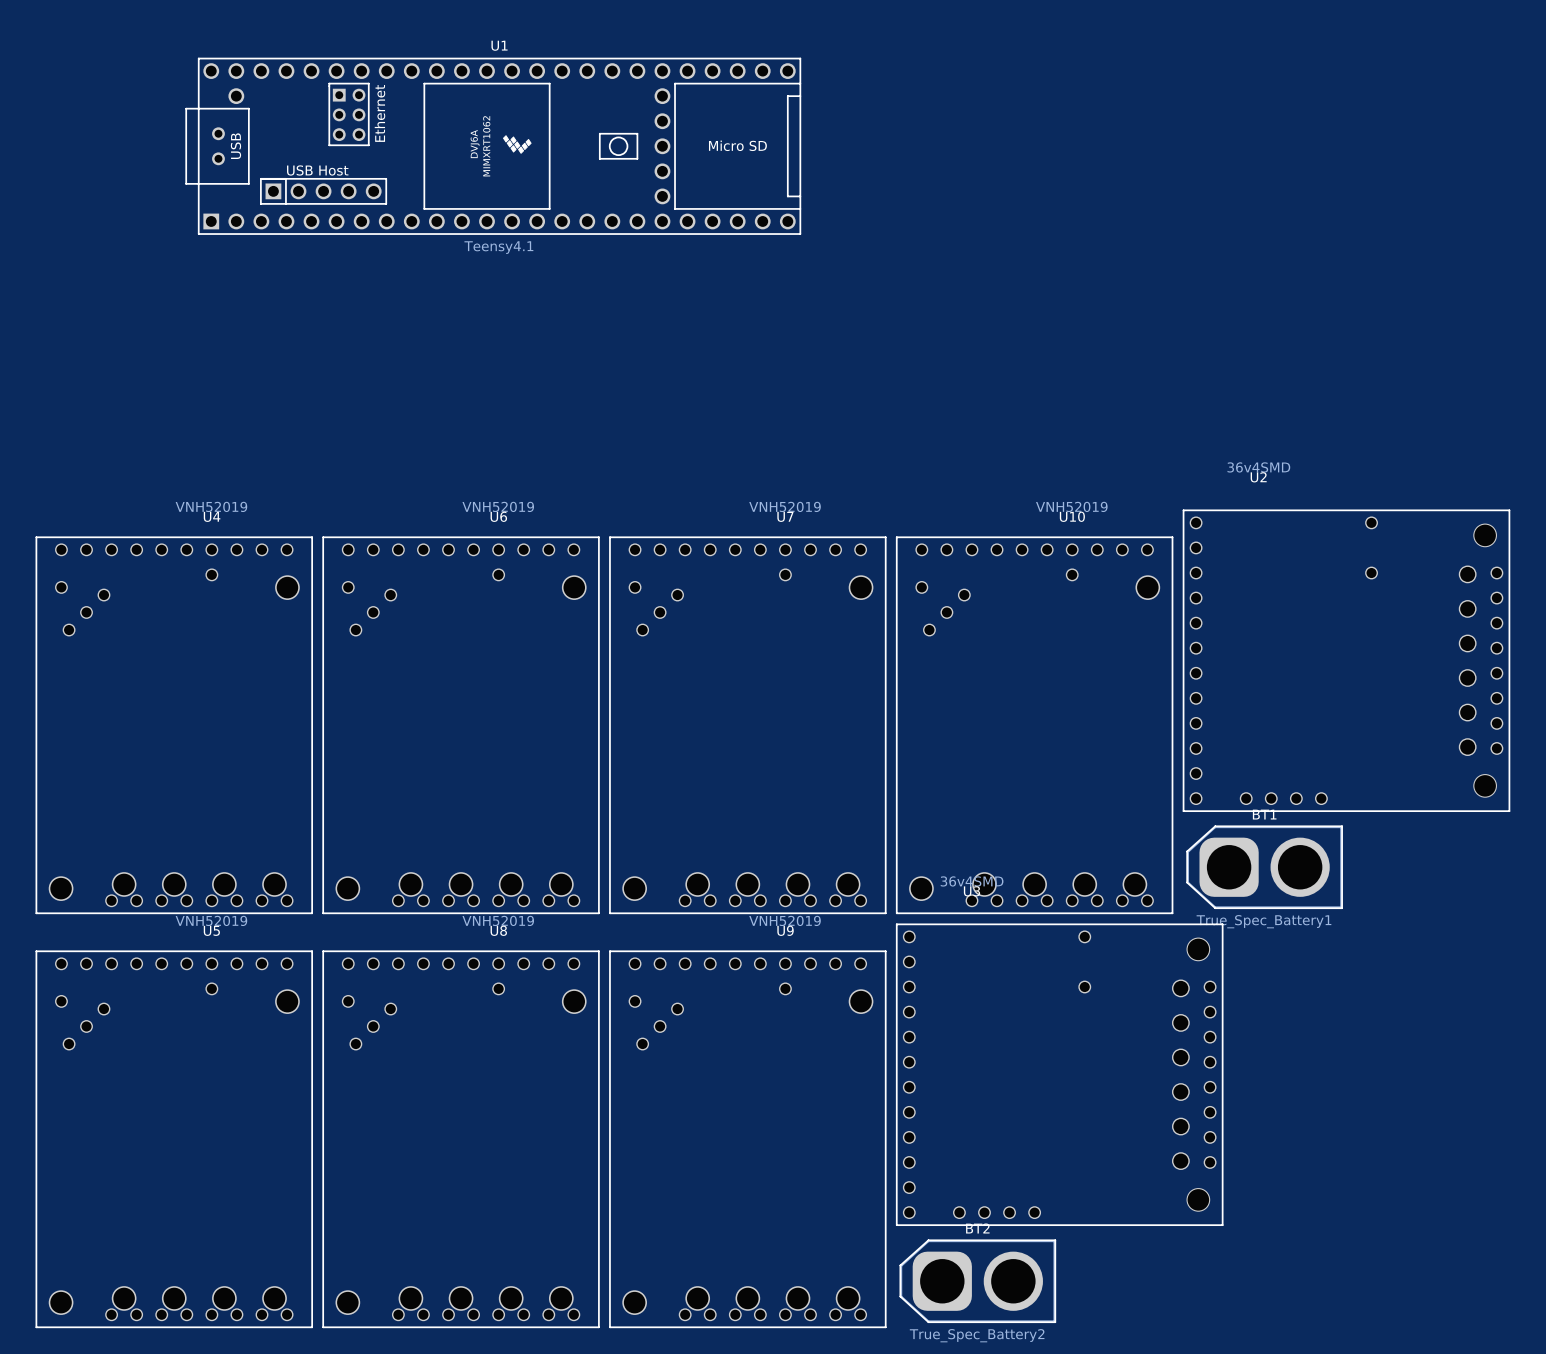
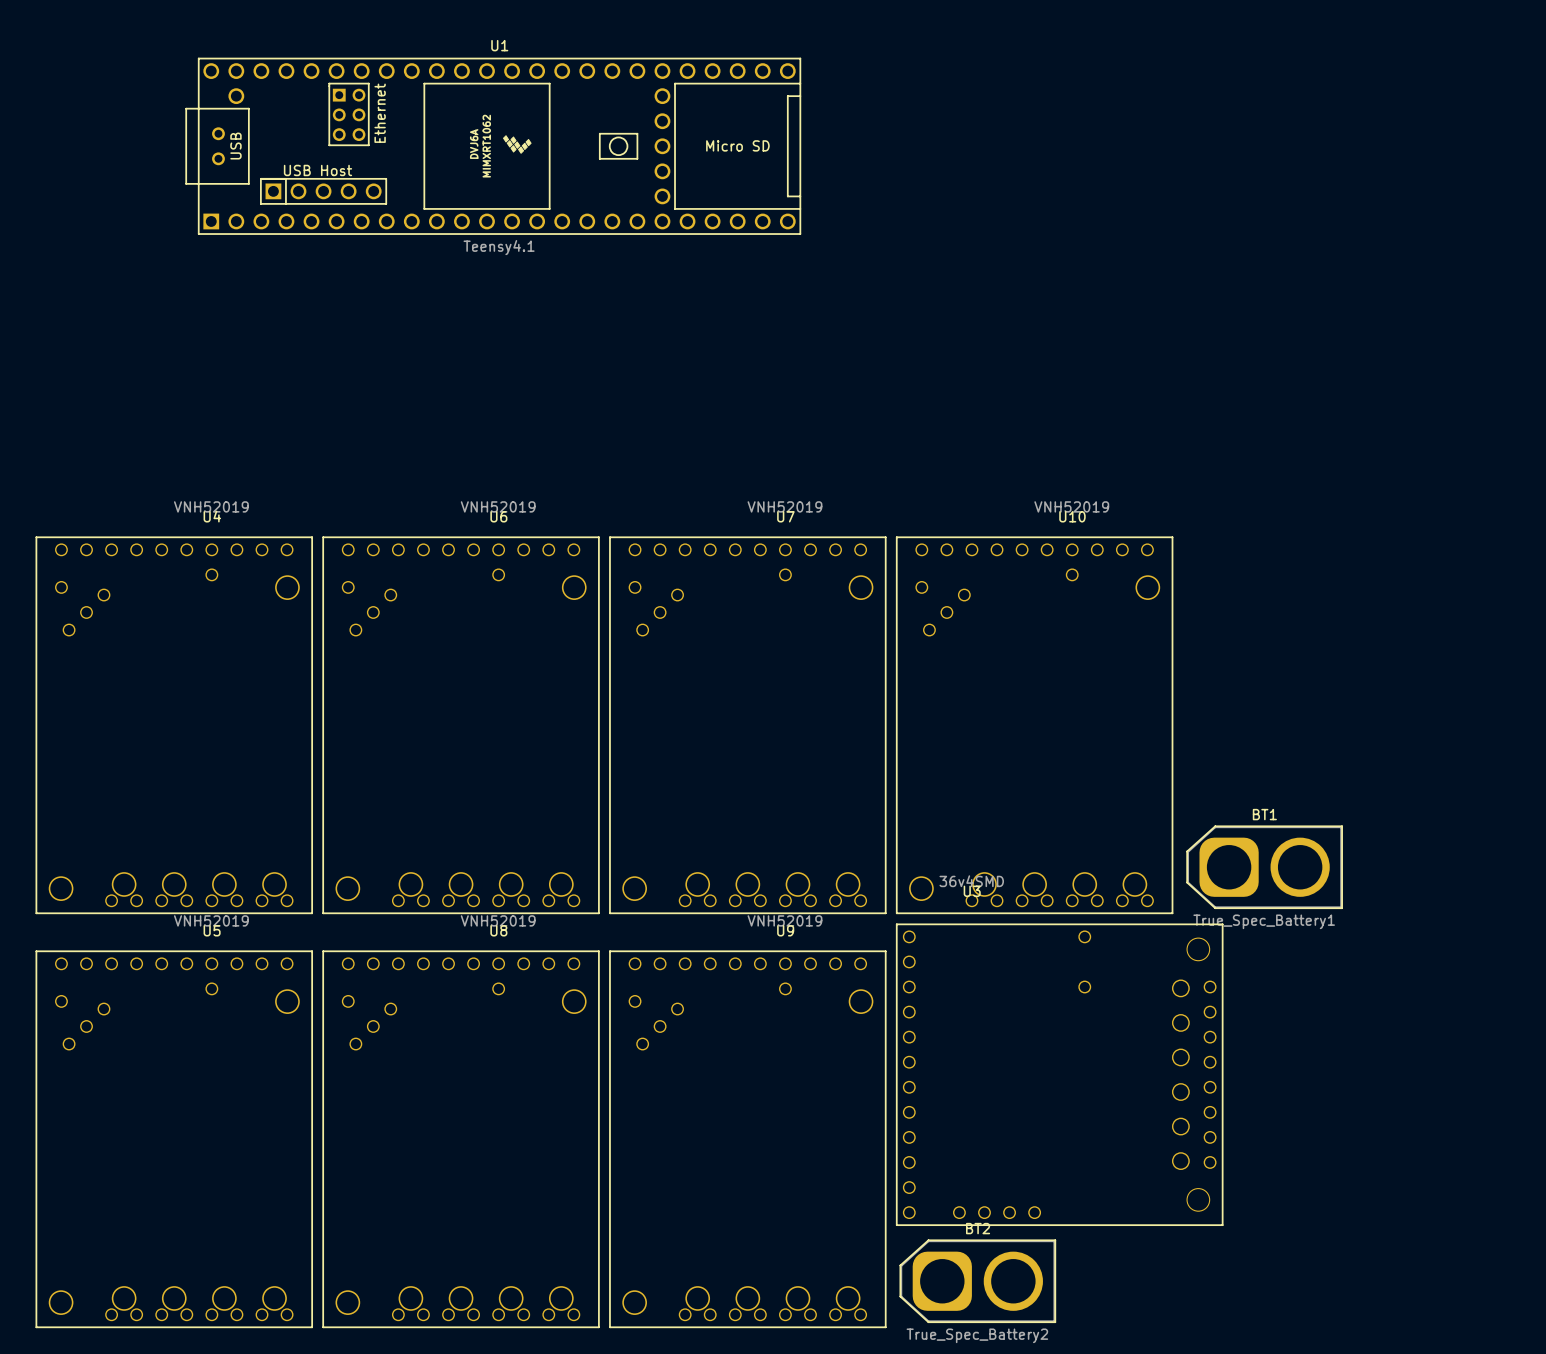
U2: 36v4SMD (1346, 660) -> none

